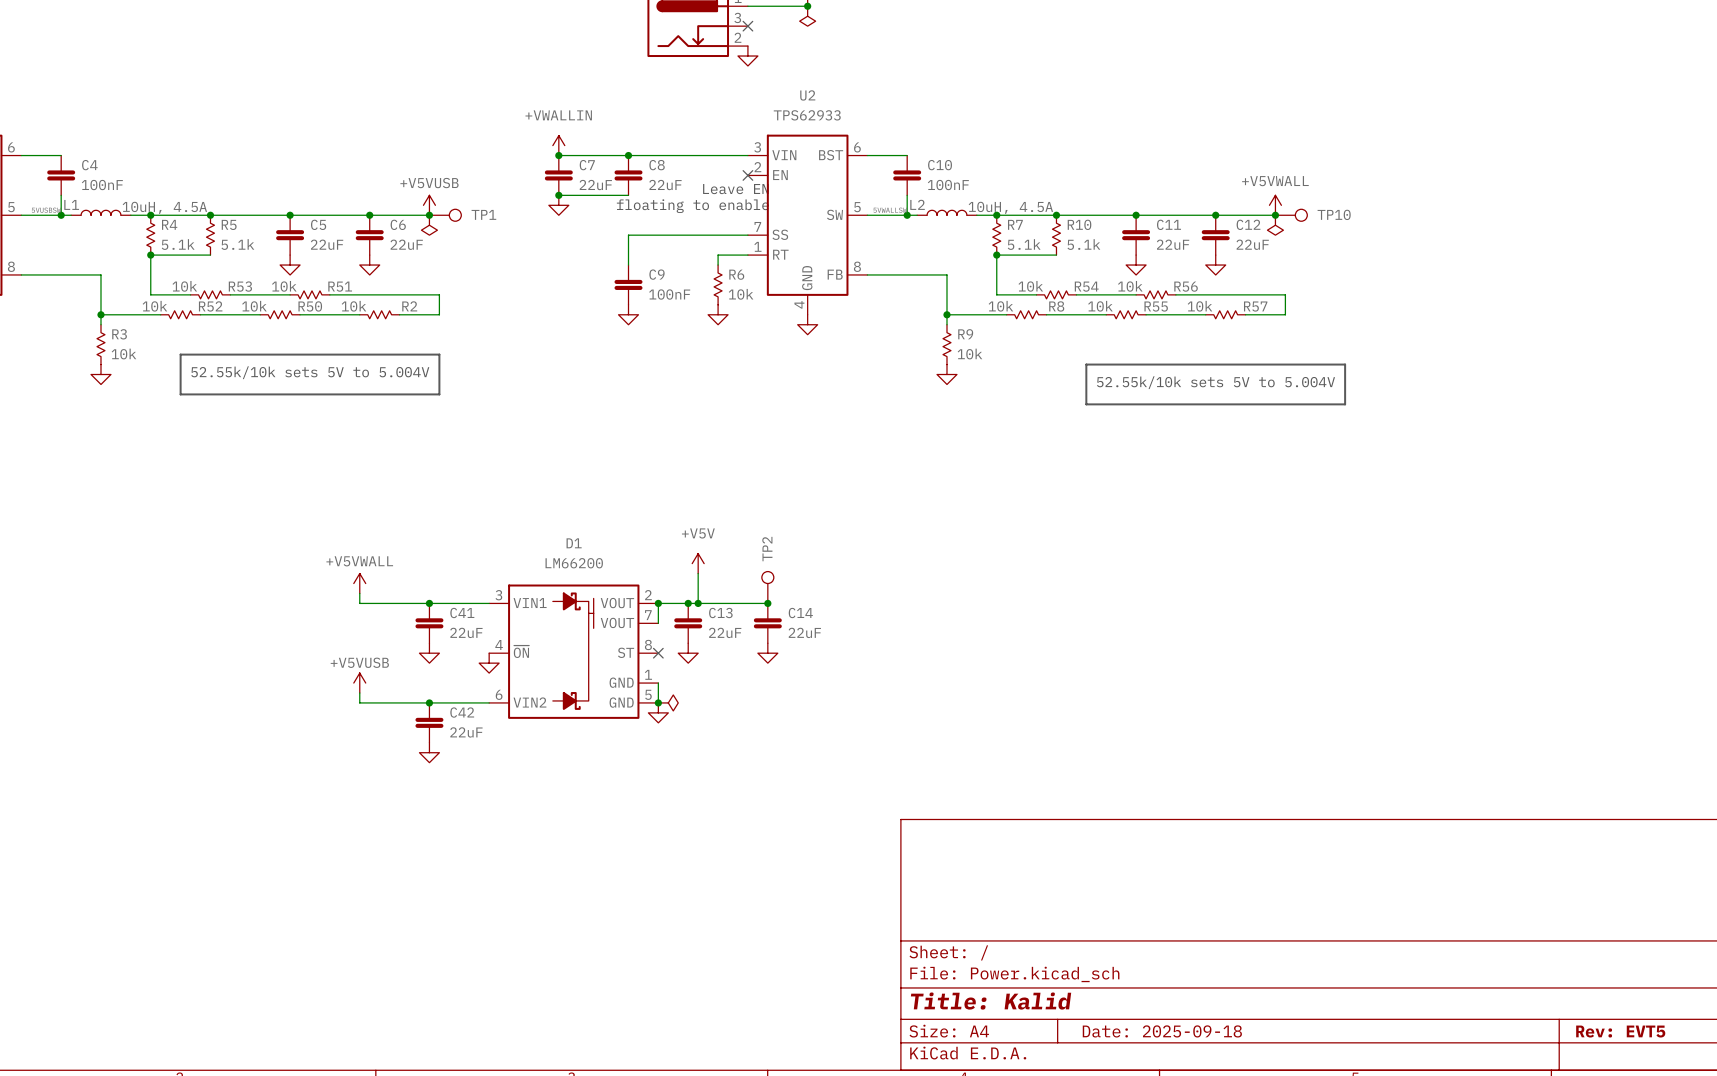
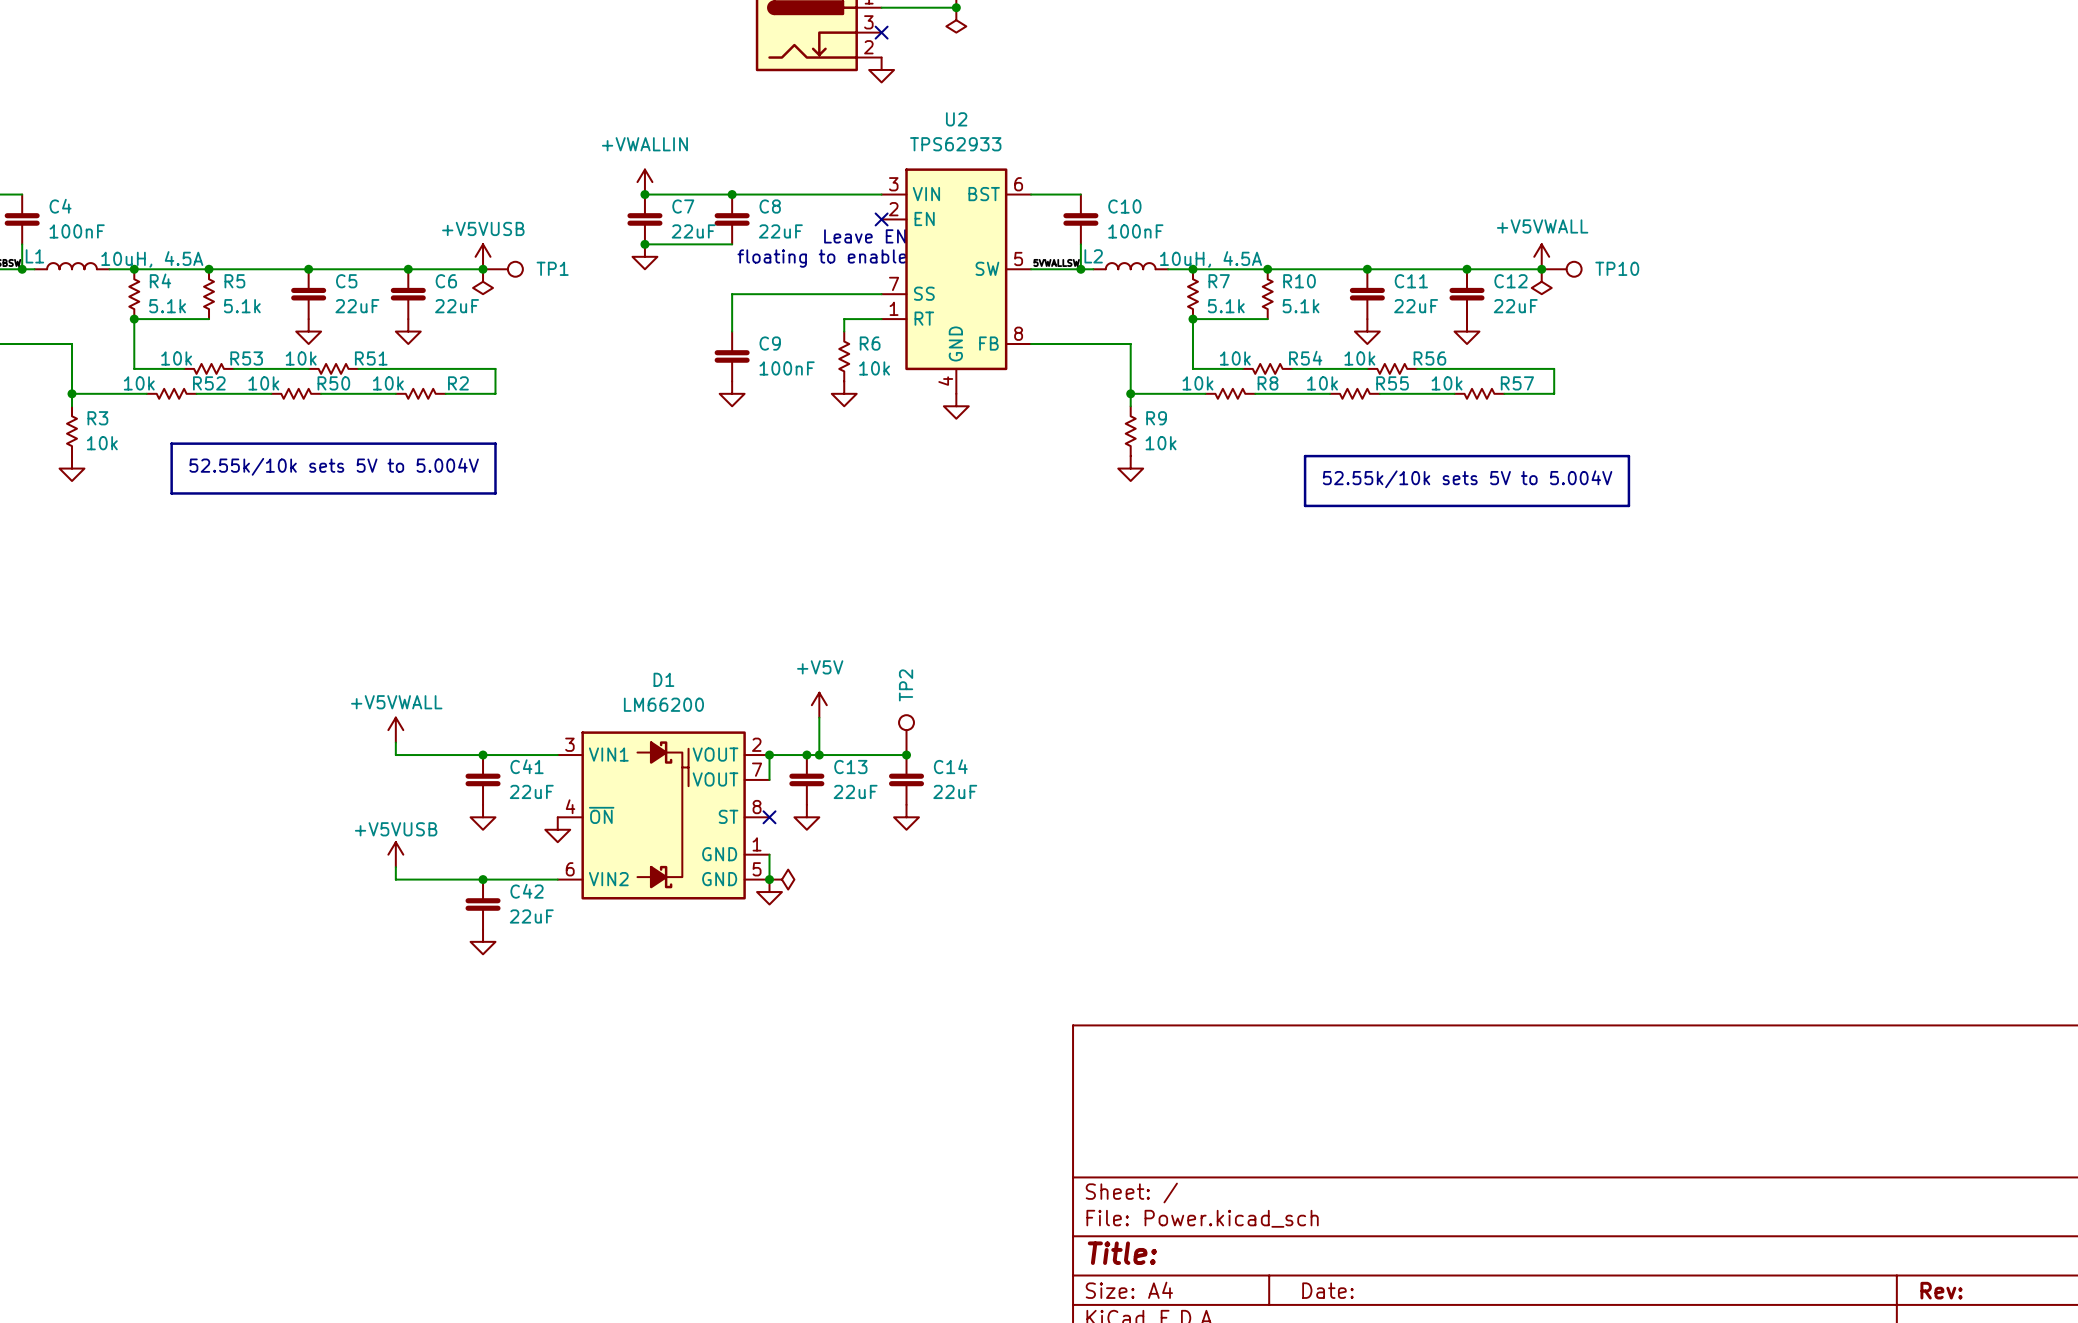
title block: Title: Kalid (991, 1001) -> Title: (1122, 1253)
title block: Date: 2025-09-18 (1162, 1031) -> Date: (1327, 1290)
title block: Rev: EVT5 (1620, 1031) -> Rev: (1941, 1290)

